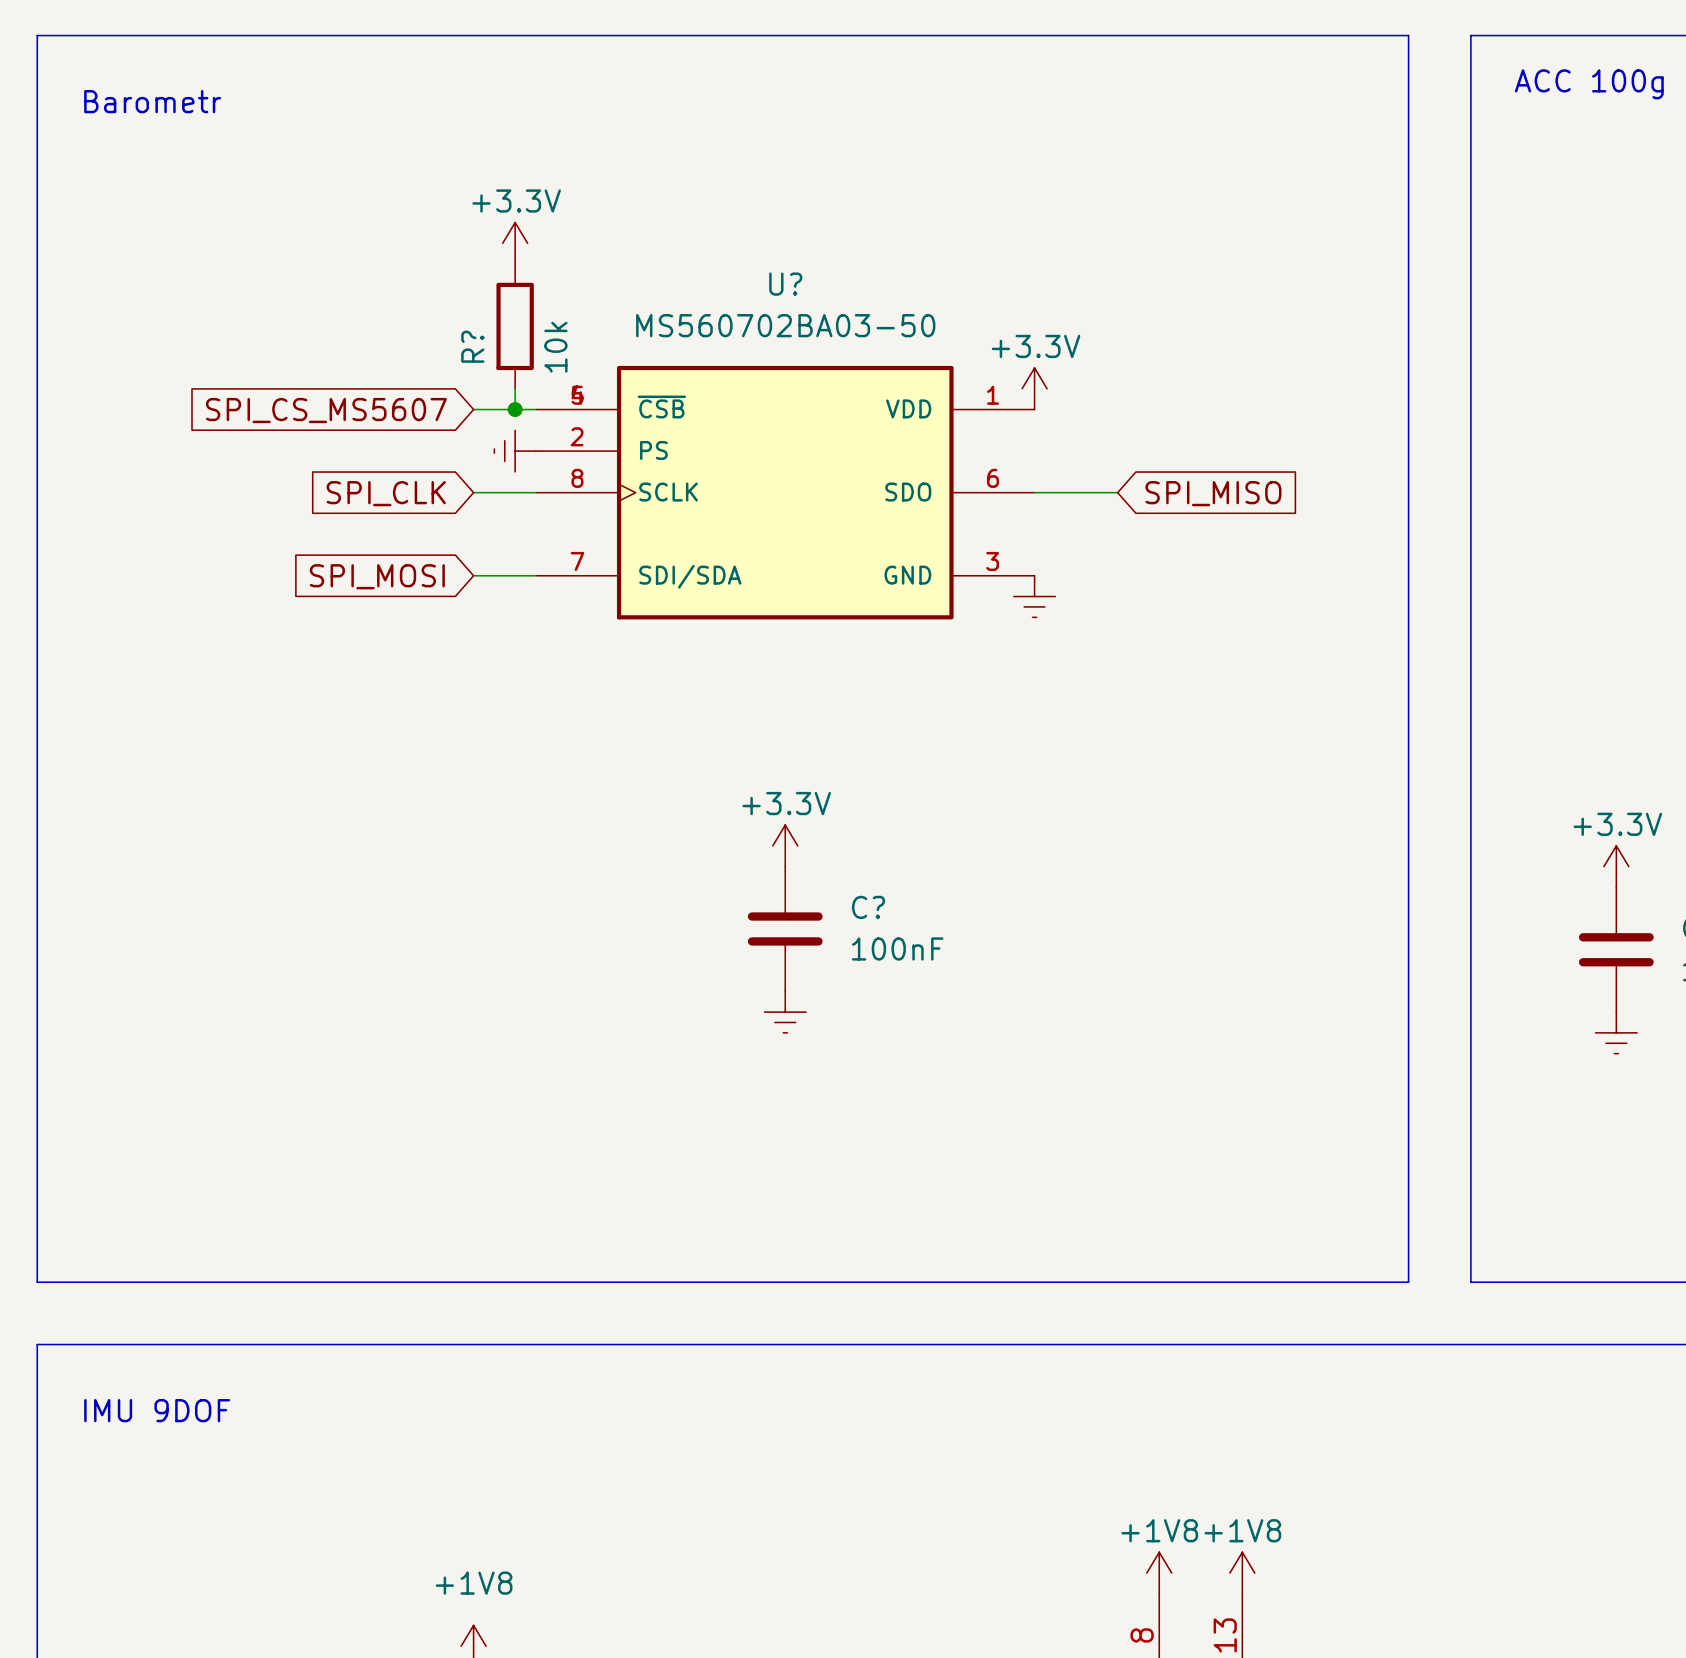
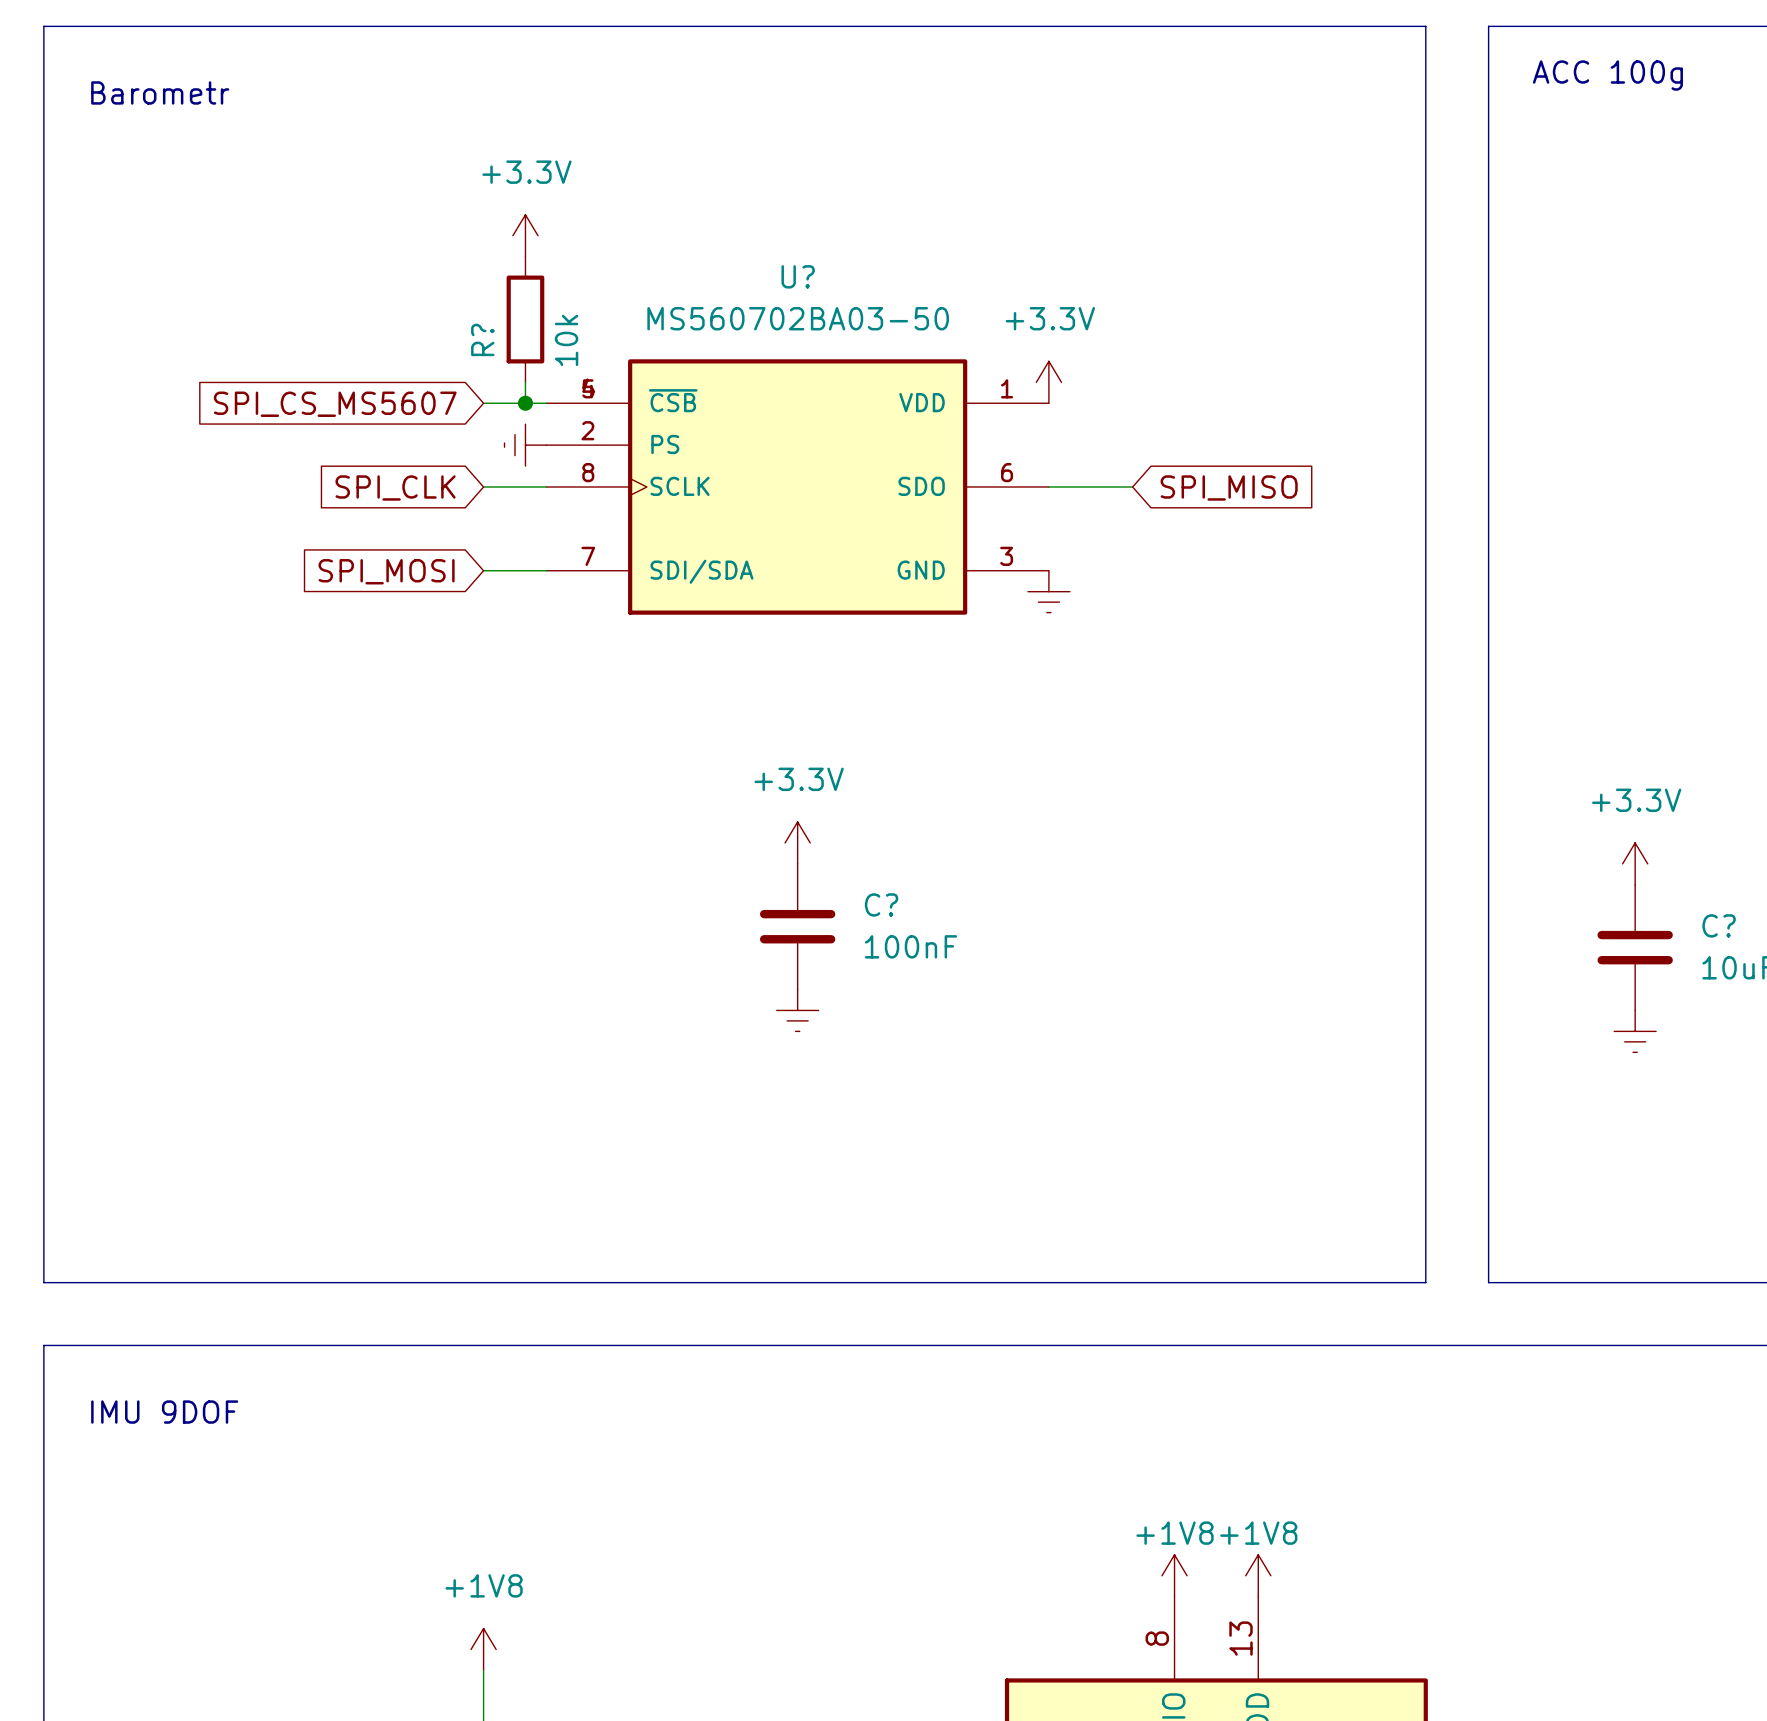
power symbol text position: +3.3V (516, 201) -> +3.3V (526, 172)
power symbol text position: +3.3V (1036, 346) -> +3.3V (1050, 318)
power symbol text position: +3.3V (786, 803) -> +3.3V (799, 779)
power symbol text position: +3.3V (1617, 824) -> +3.3V (1636, 800)

